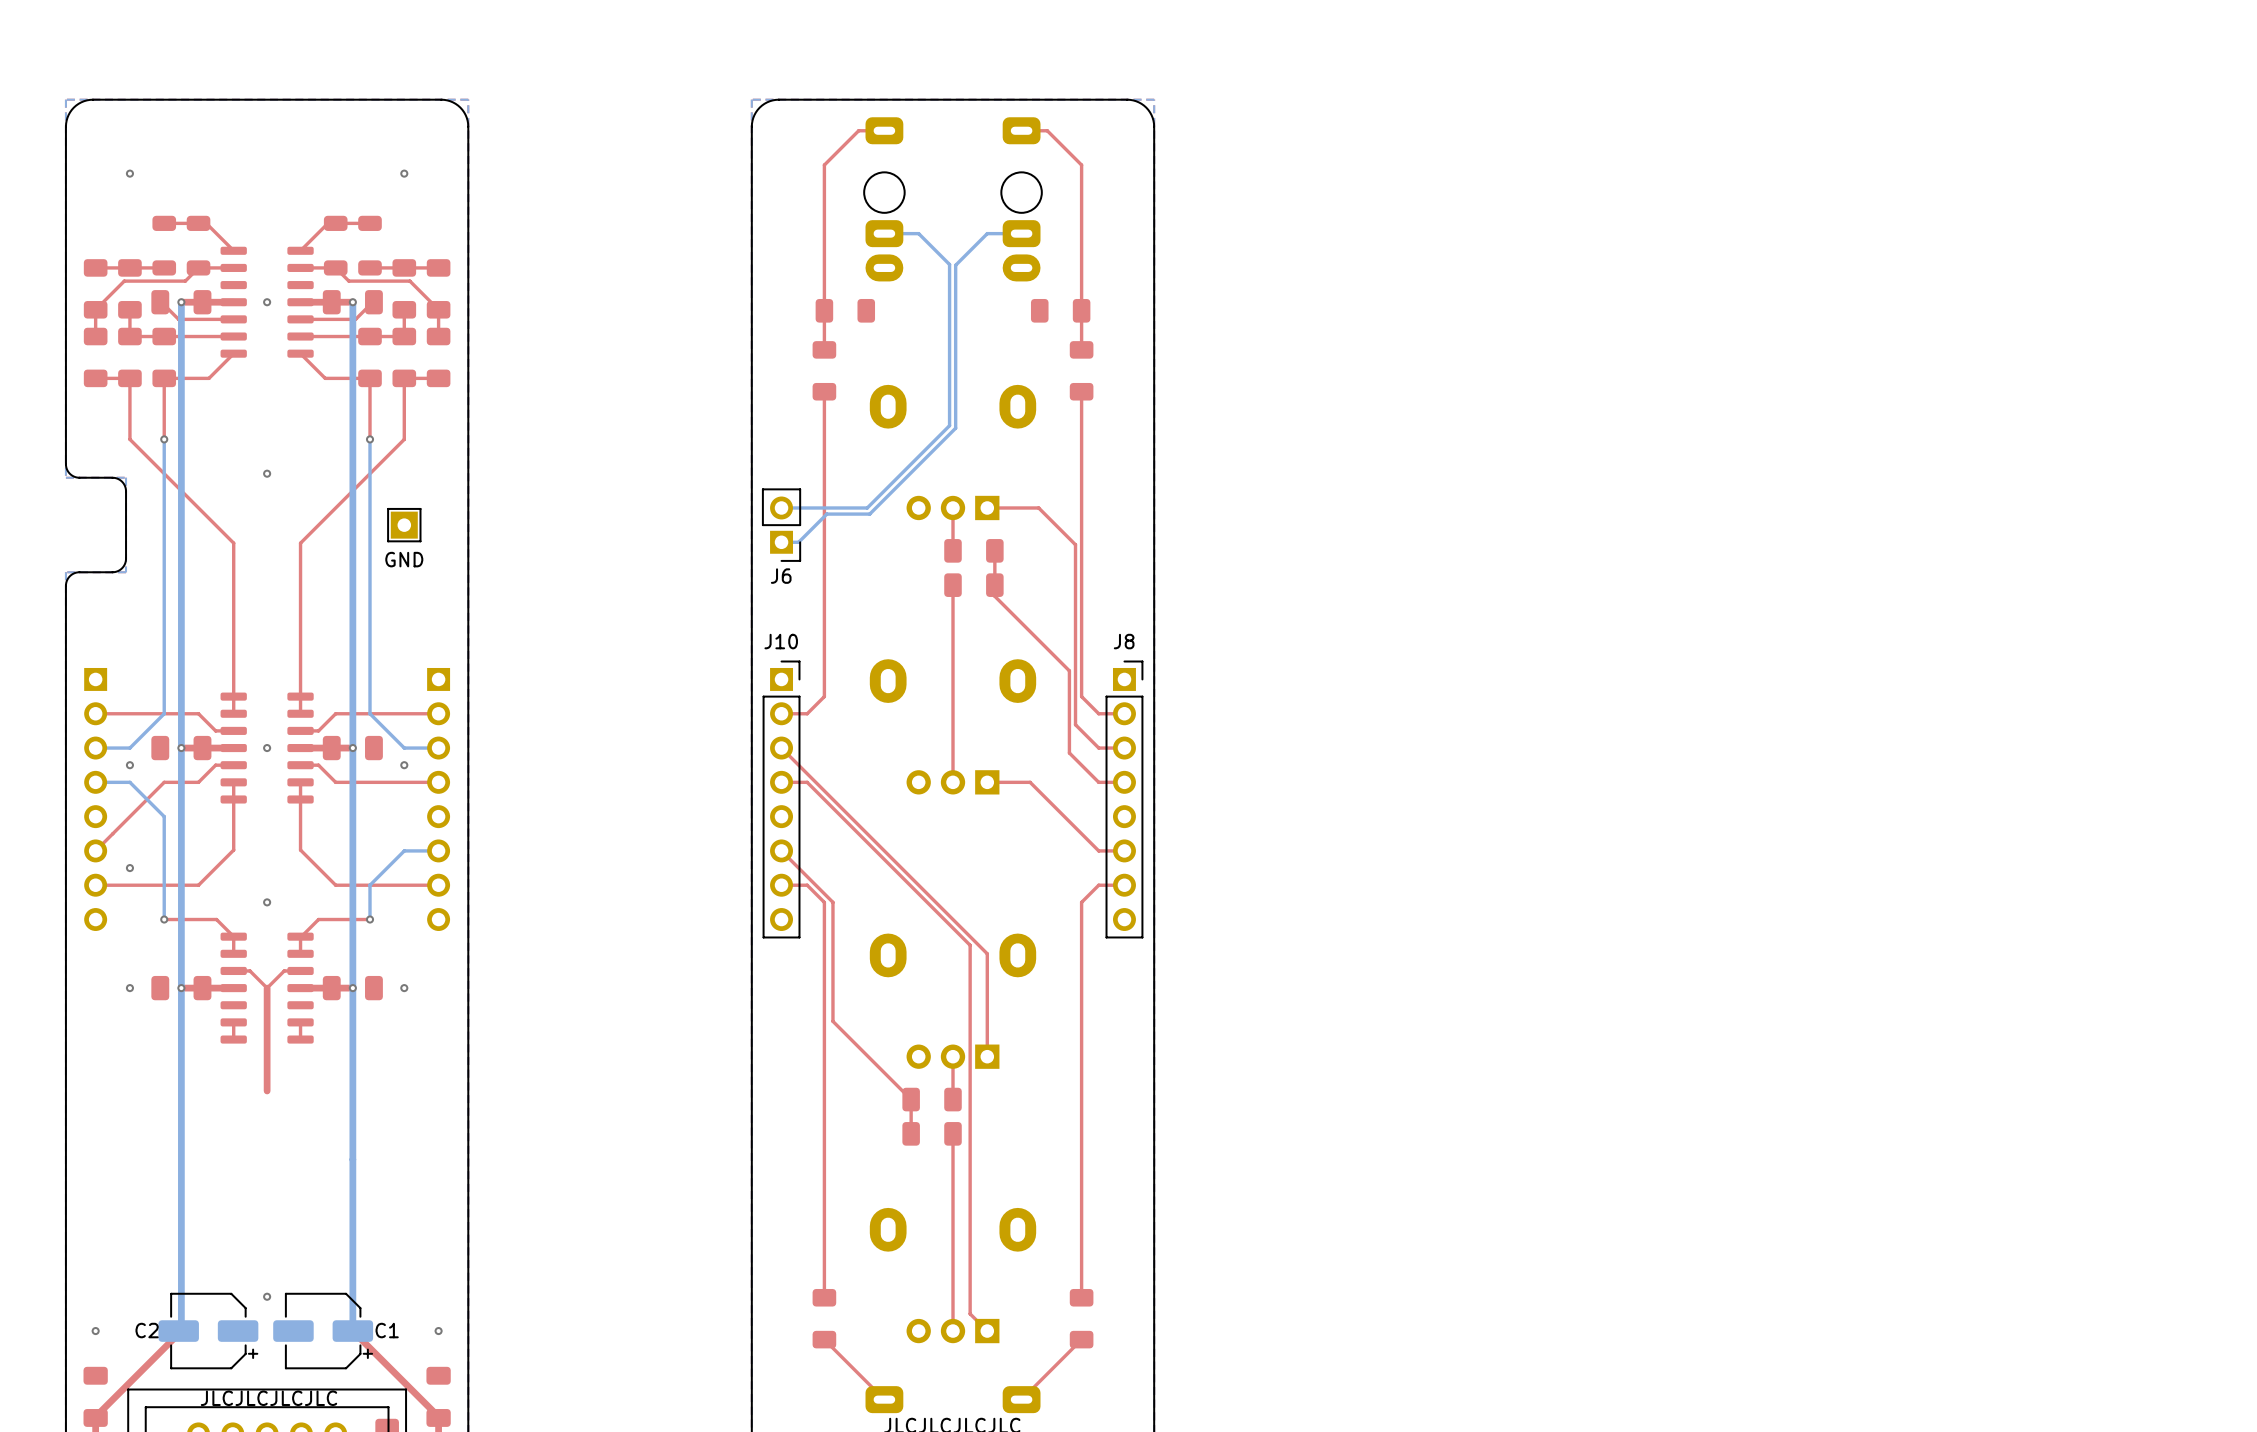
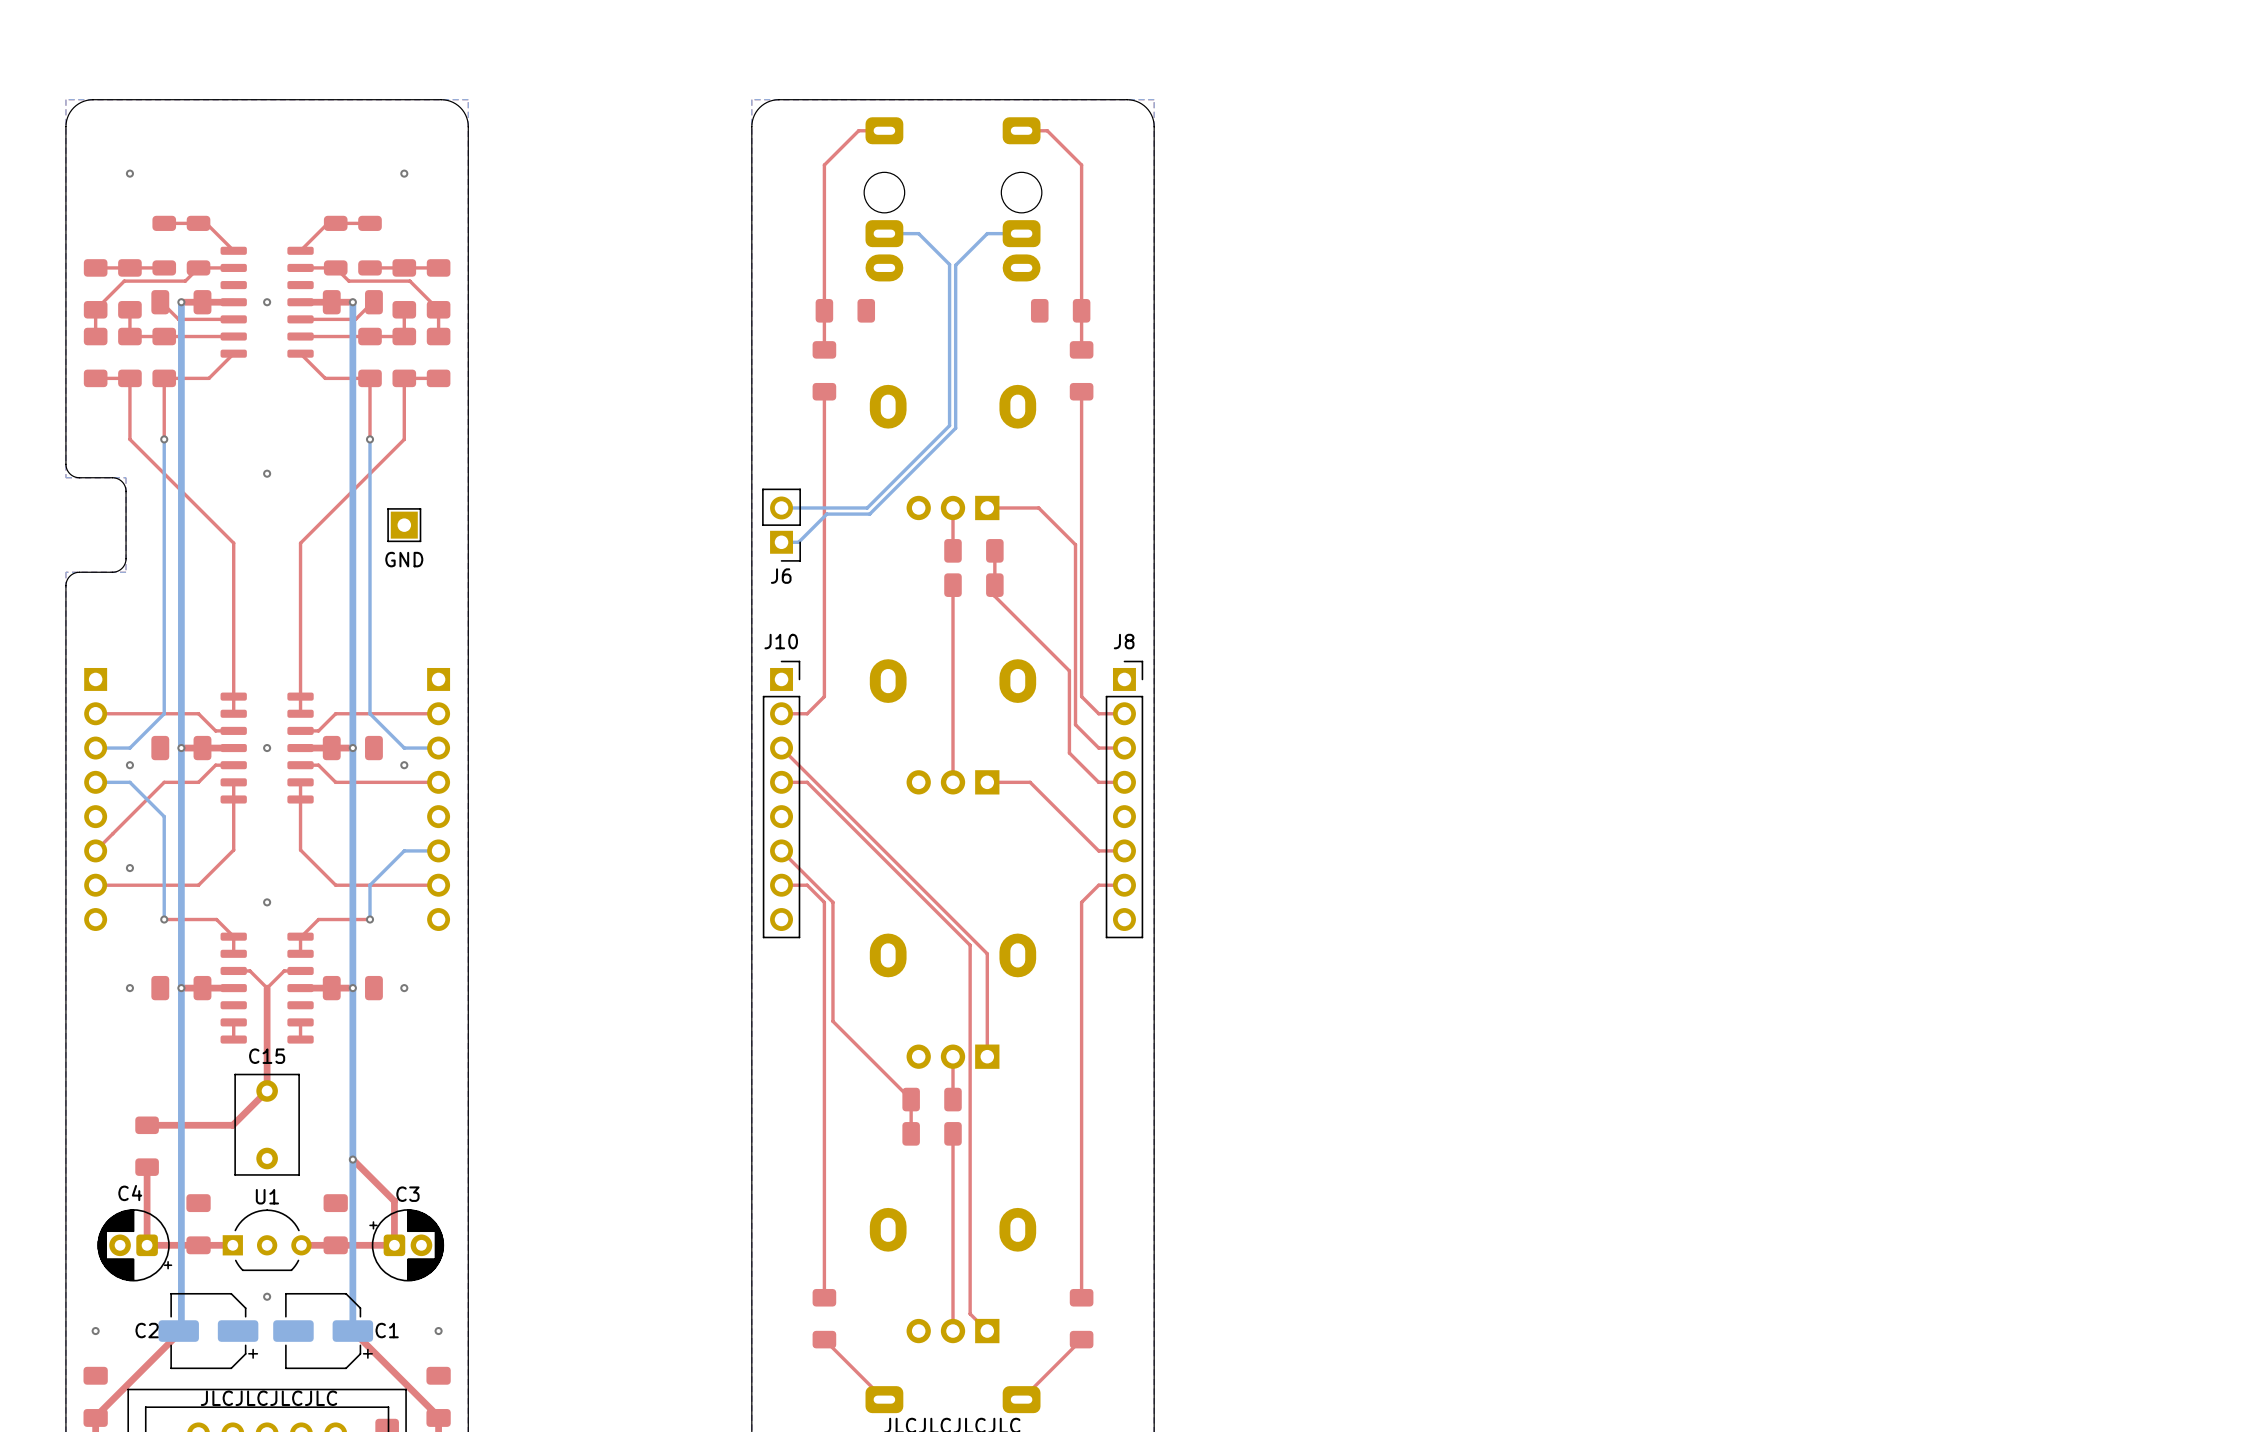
top track: none -> (267, 1090) (232, 1125) (147, 1125)
C15: none -> (267, 1124)
part: none -> (147, 1146)
top track: none -> (352, 1159) (394, 1201) (394, 1245) (301, 1245)
via: none -> (352, 1159)
top track: none -> (147, 1167) (147, 1245) (232, 1245)
part: none -> (198, 1224)
part: none -> (335, 1224)
U1: none -> (267, 1240)
C4: none -> (134, 1245)
C3: none -> (406, 1245)

